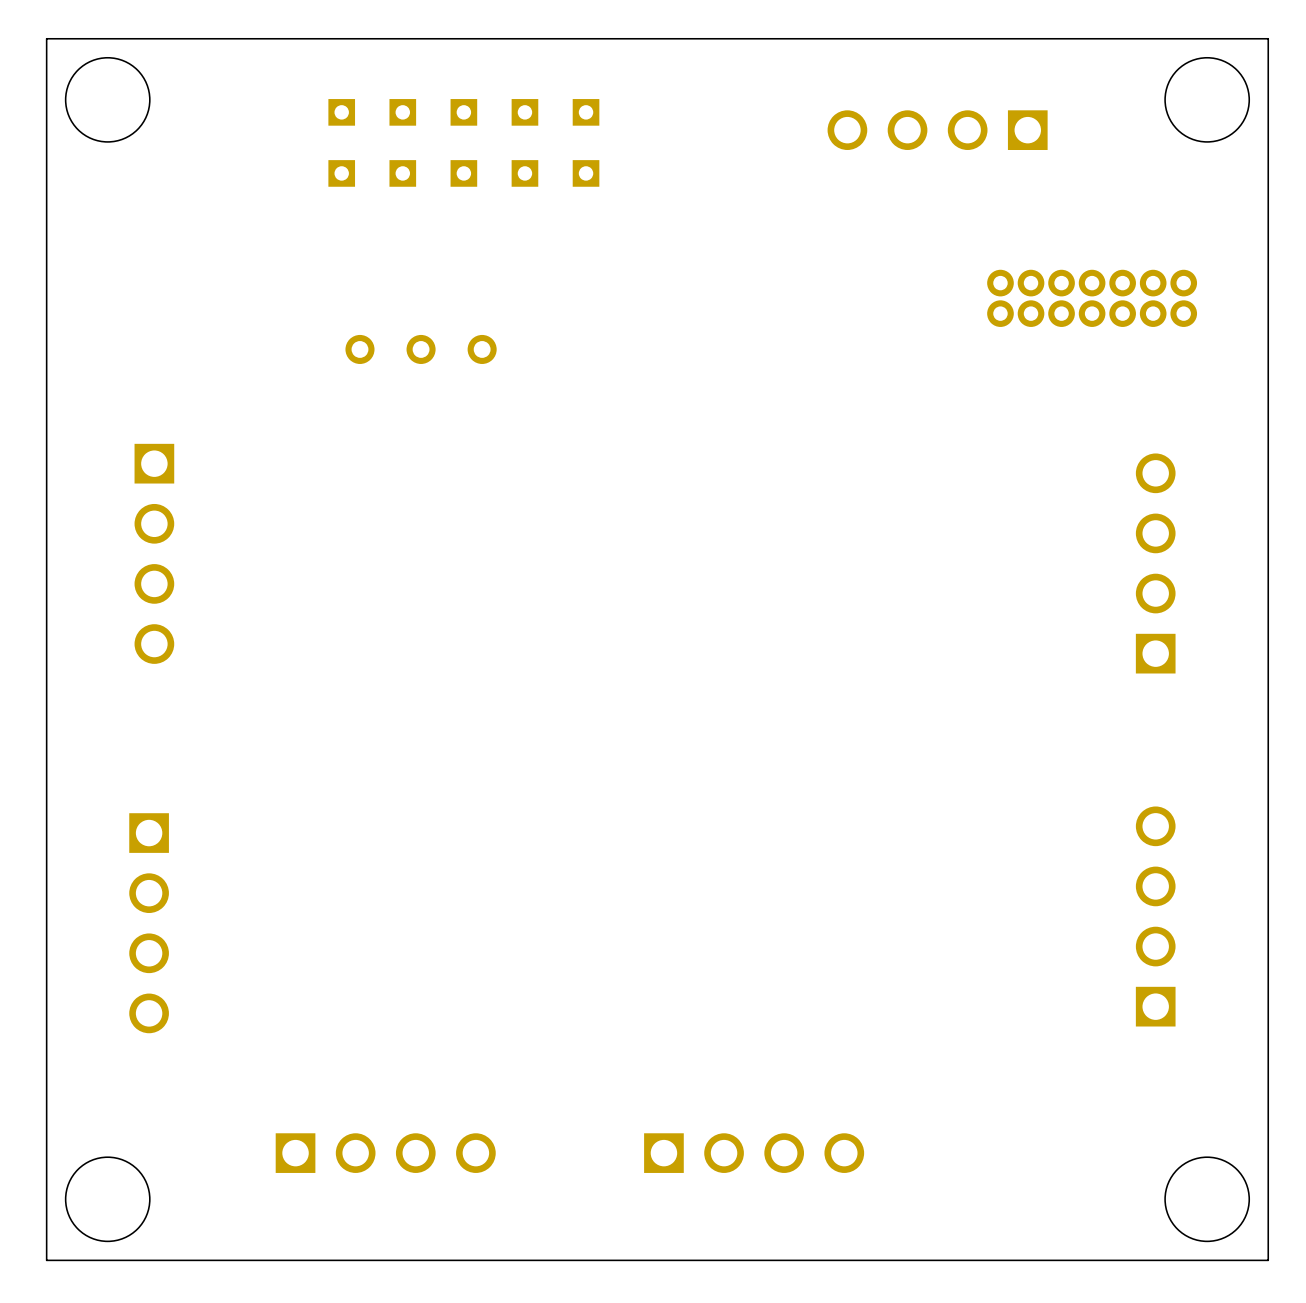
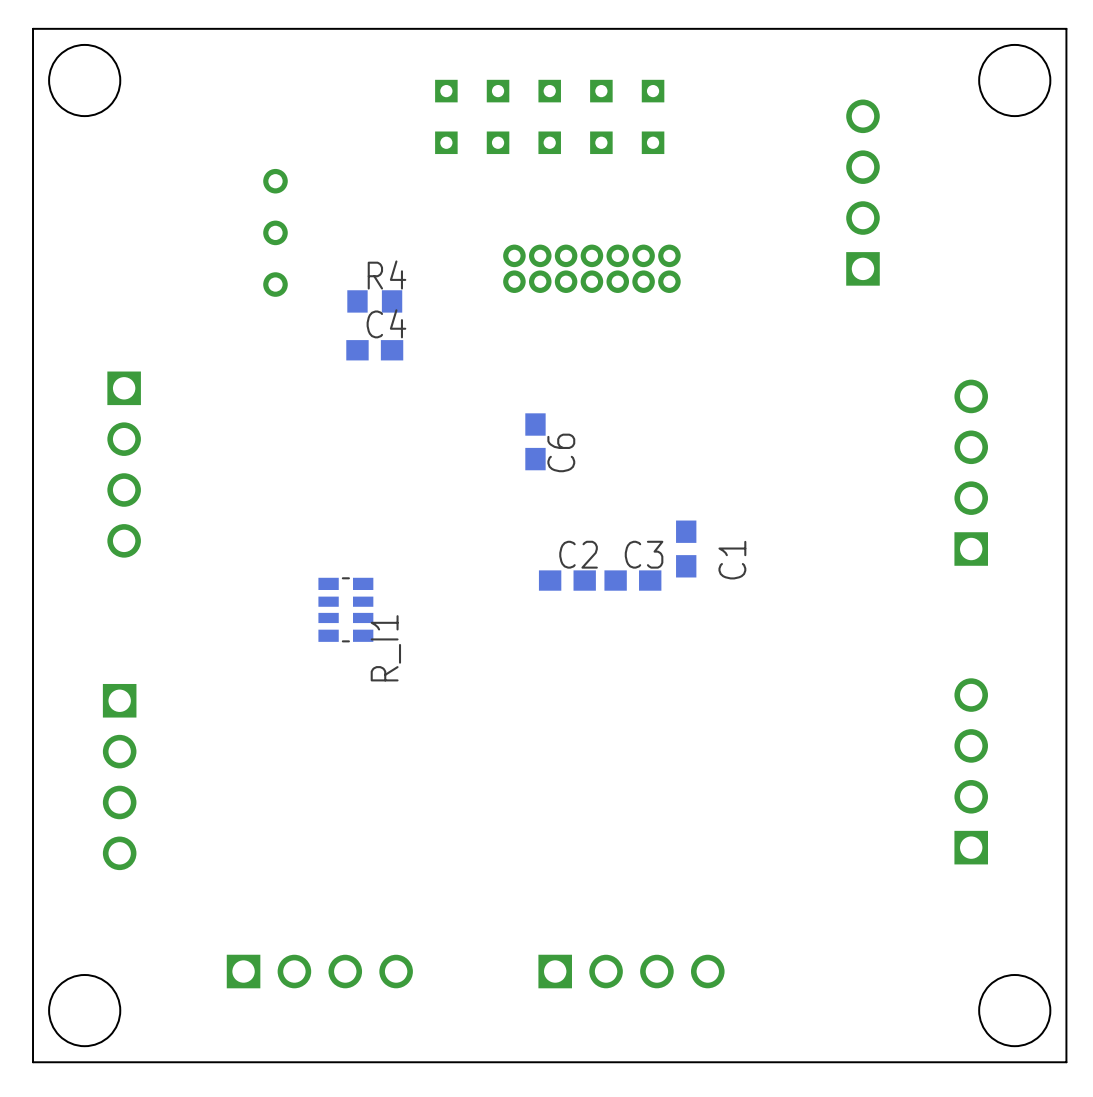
part rotation: 0° (937, 130) -> 90° clockwise (862, 192)
part position: (937, 130) -> (862, 192)
part position: (463, 142) -> (549, 116)
part position: (1092, 298) -> (591, 268)
part rotation: 0° (421, 349) -> 90° clockwise (275, 232)
part position: (421, 349) -> (275, 232)
R4: none -> (374, 301)
C4: none -> (374, 350)
C6: none -> (535, 441)
C1: none -> (686, 549)
C2: none -> (567, 580)
C3: none -> (632, 580)
R_I1: none -> (345, 609)

